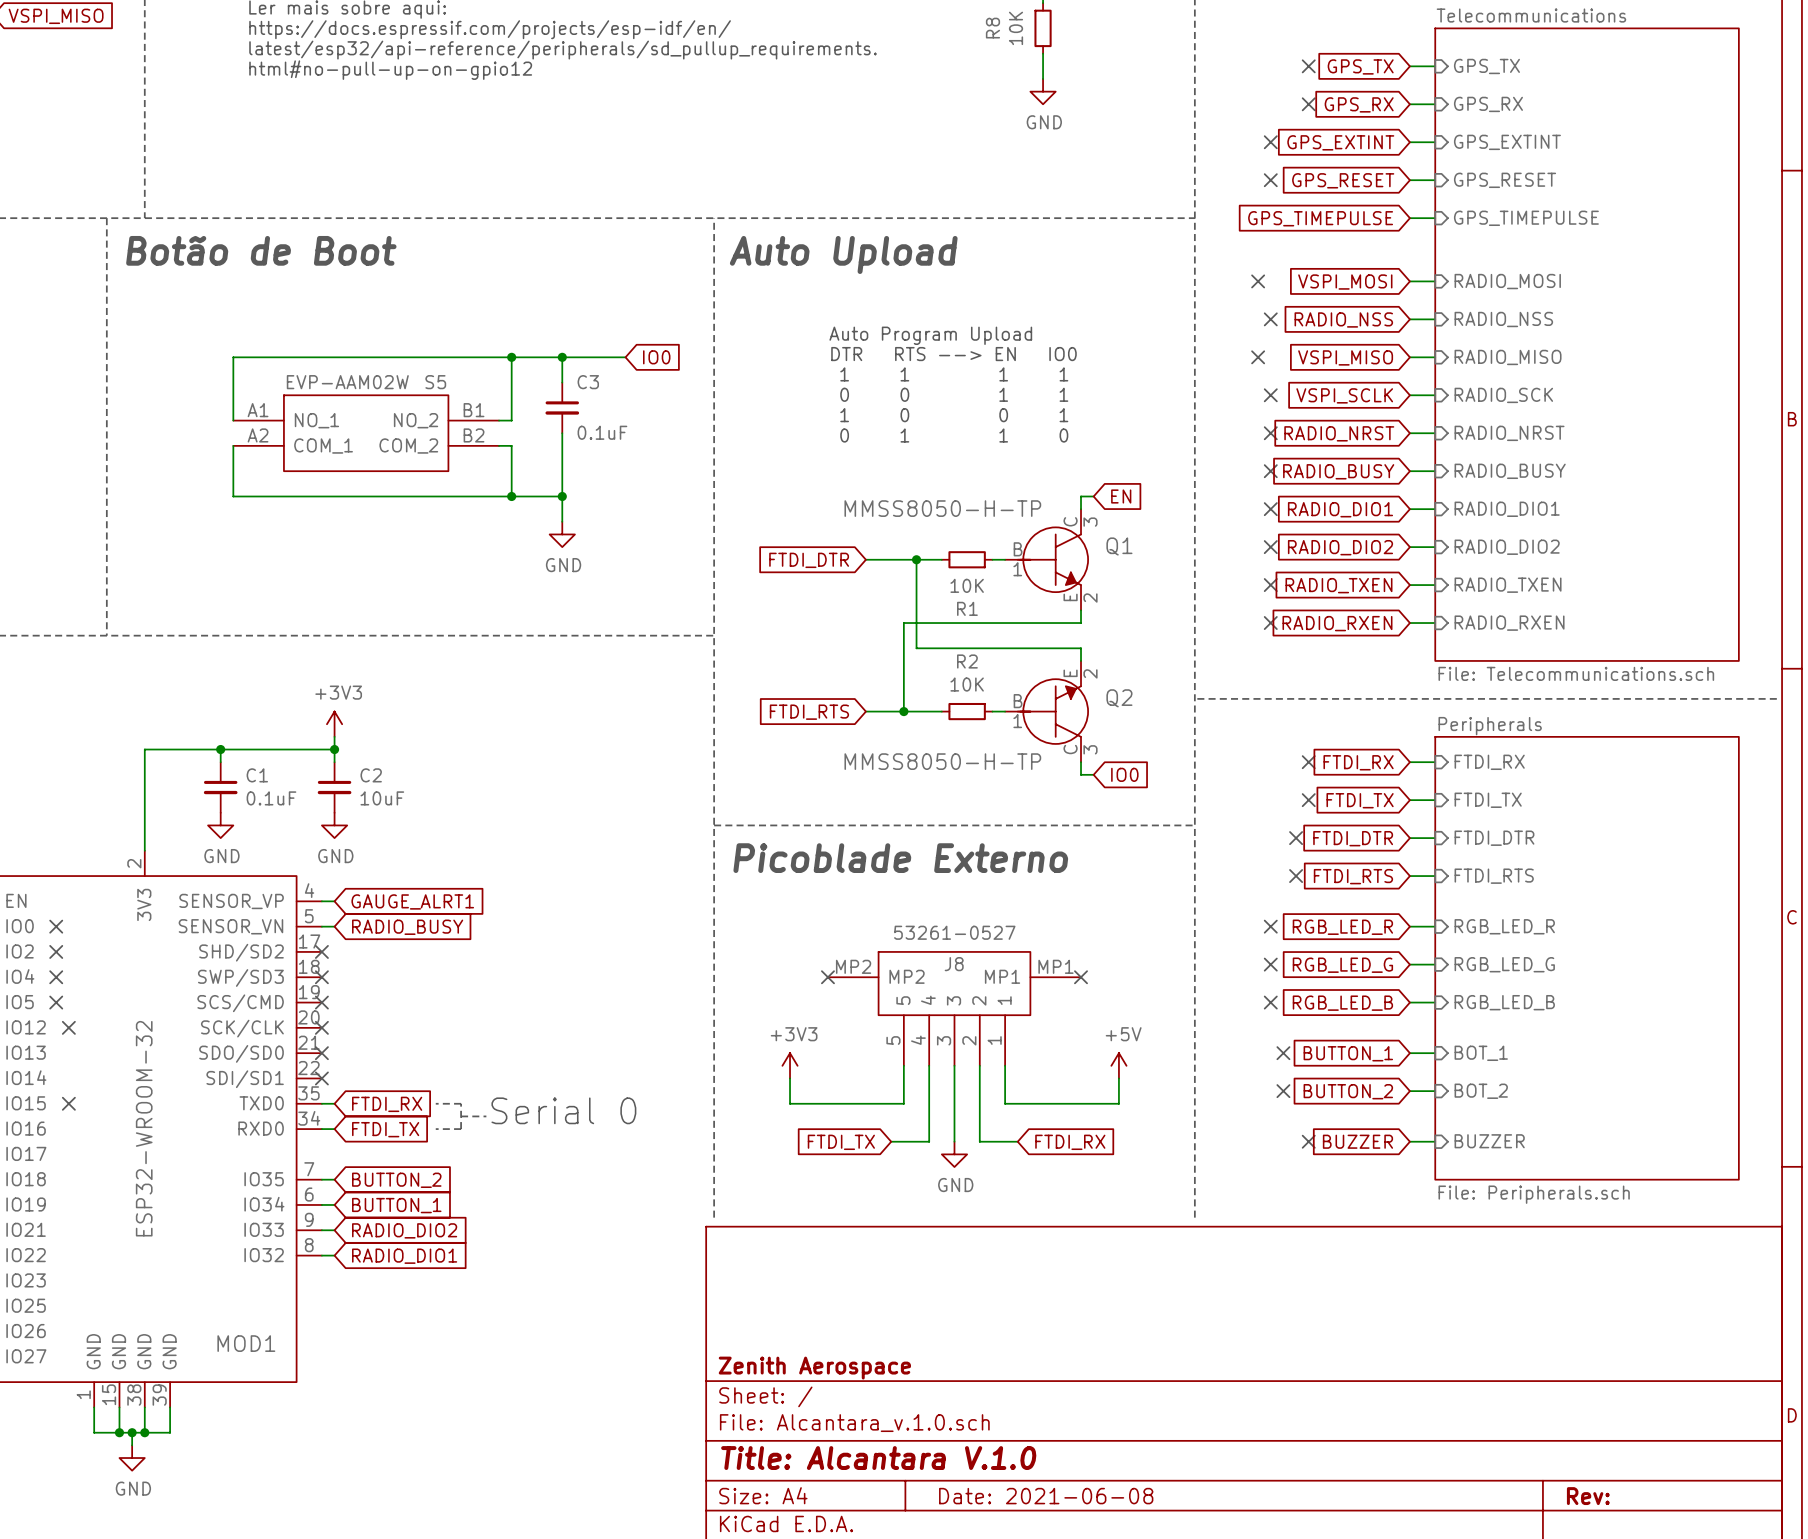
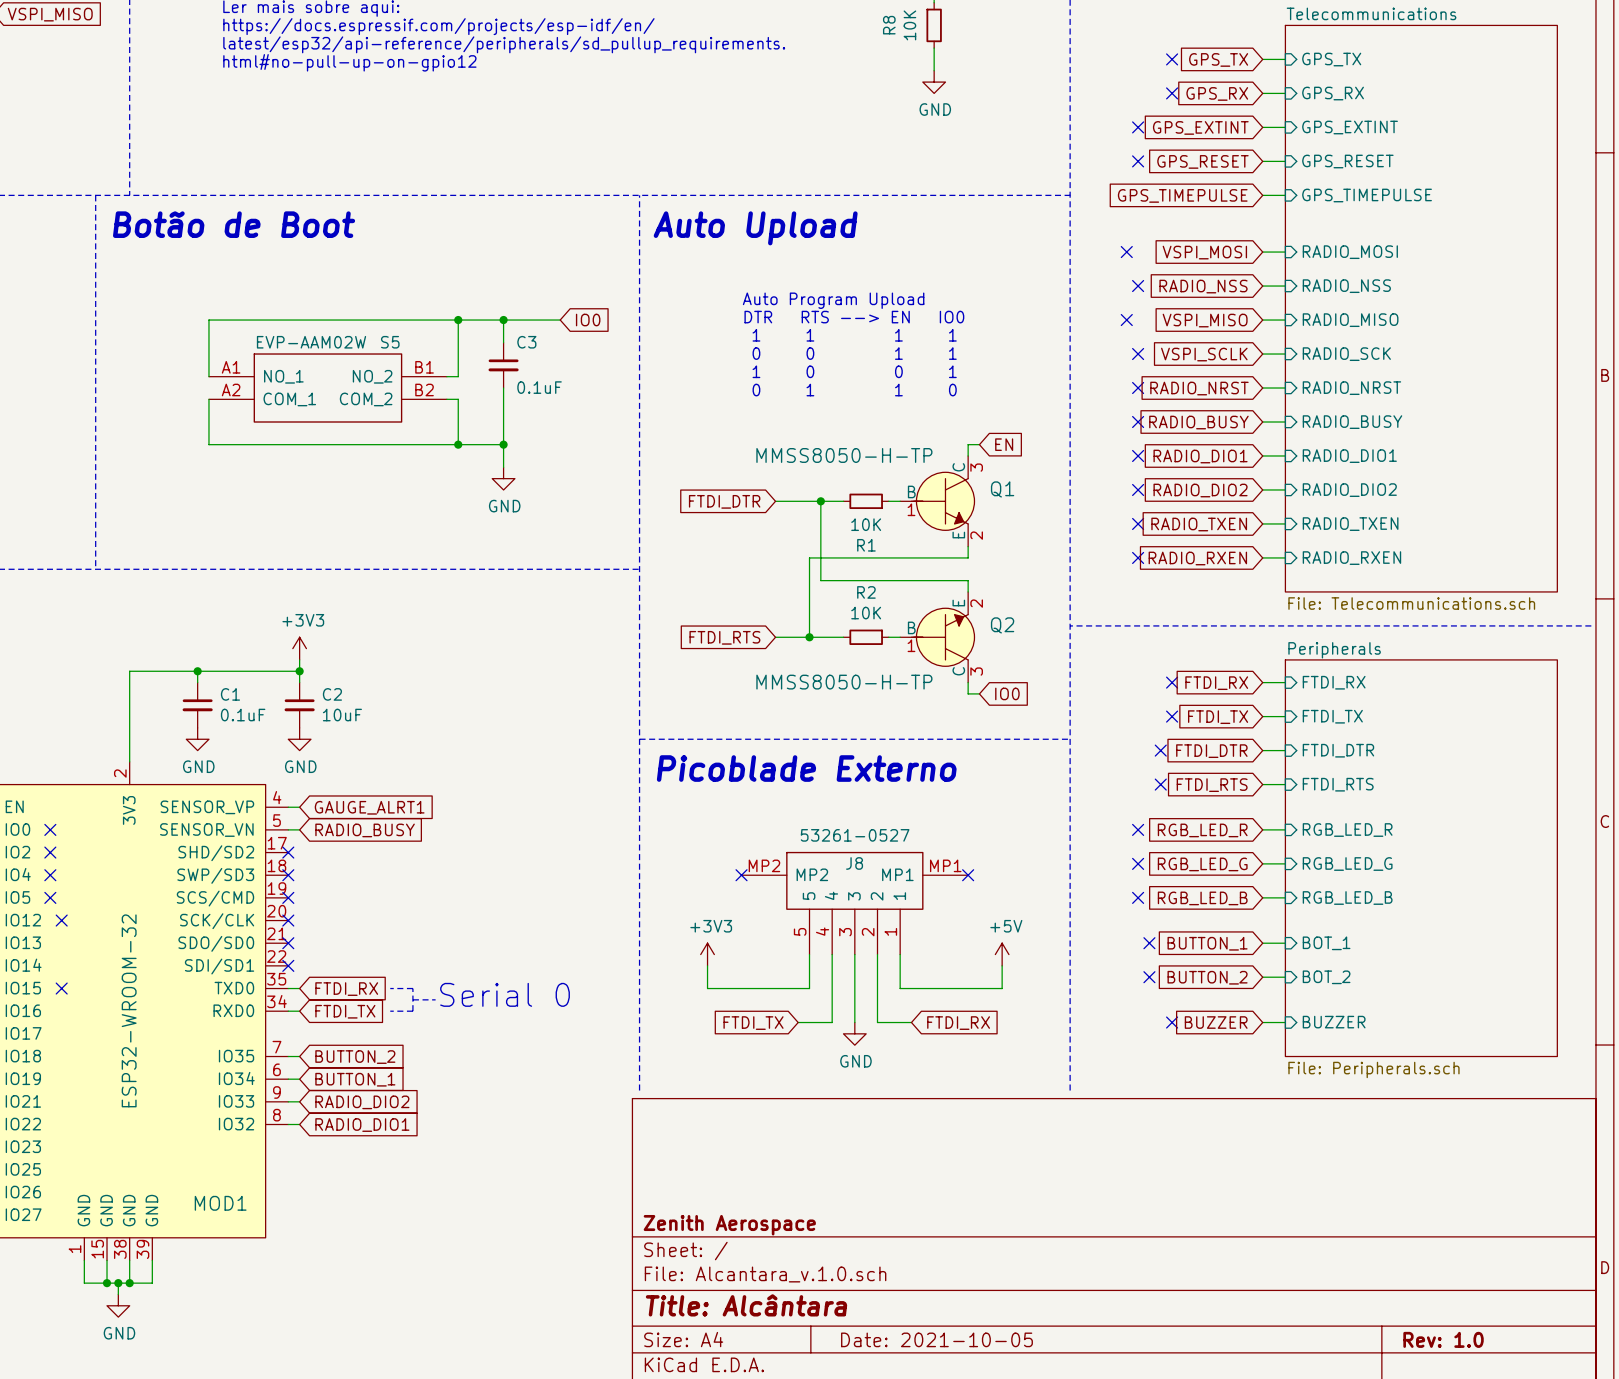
title block: Title: Alcantara V.1.0 (878, 1458) -> Title: Alcântara (746, 1305)
title block: Date: 2021-06-08 (1046, 1496) -> Date: 2021-10-05 (936, 1339)
title block: Rev: (1588, 1496) -> Rev: 1.0 (1443, 1339)

